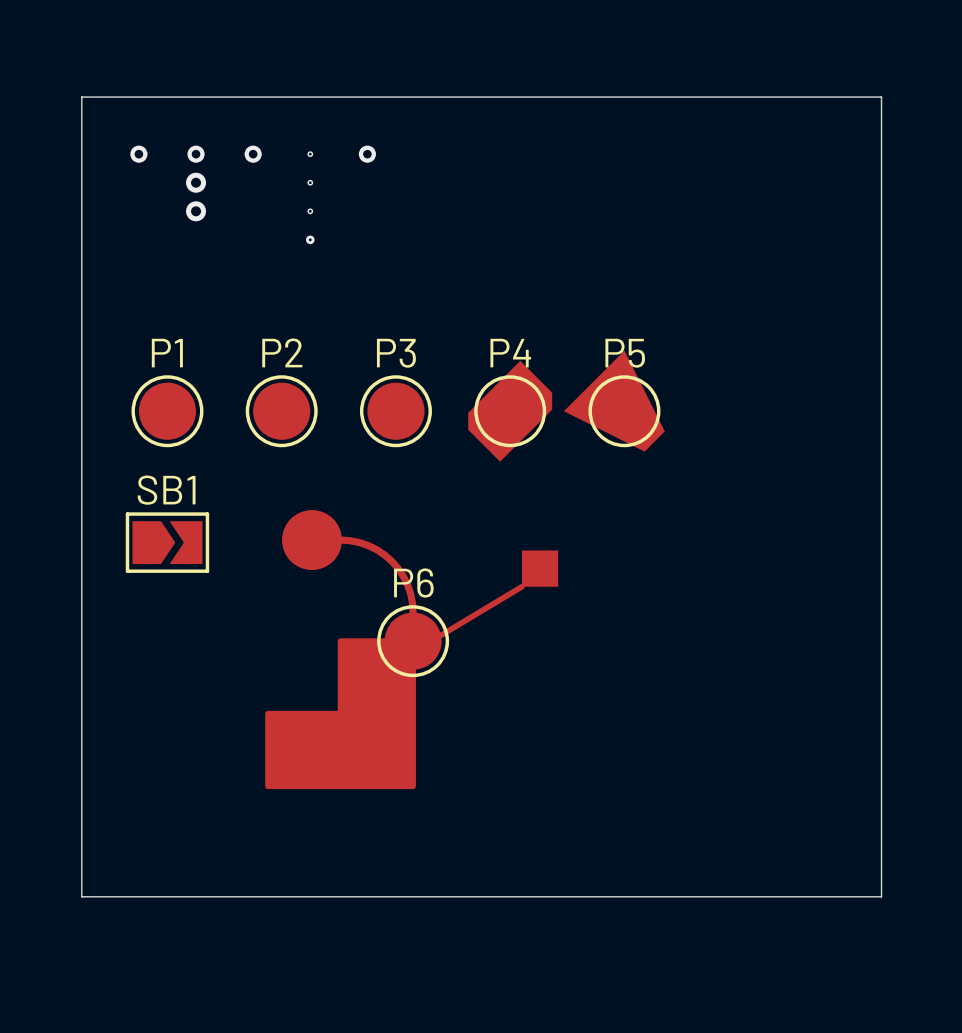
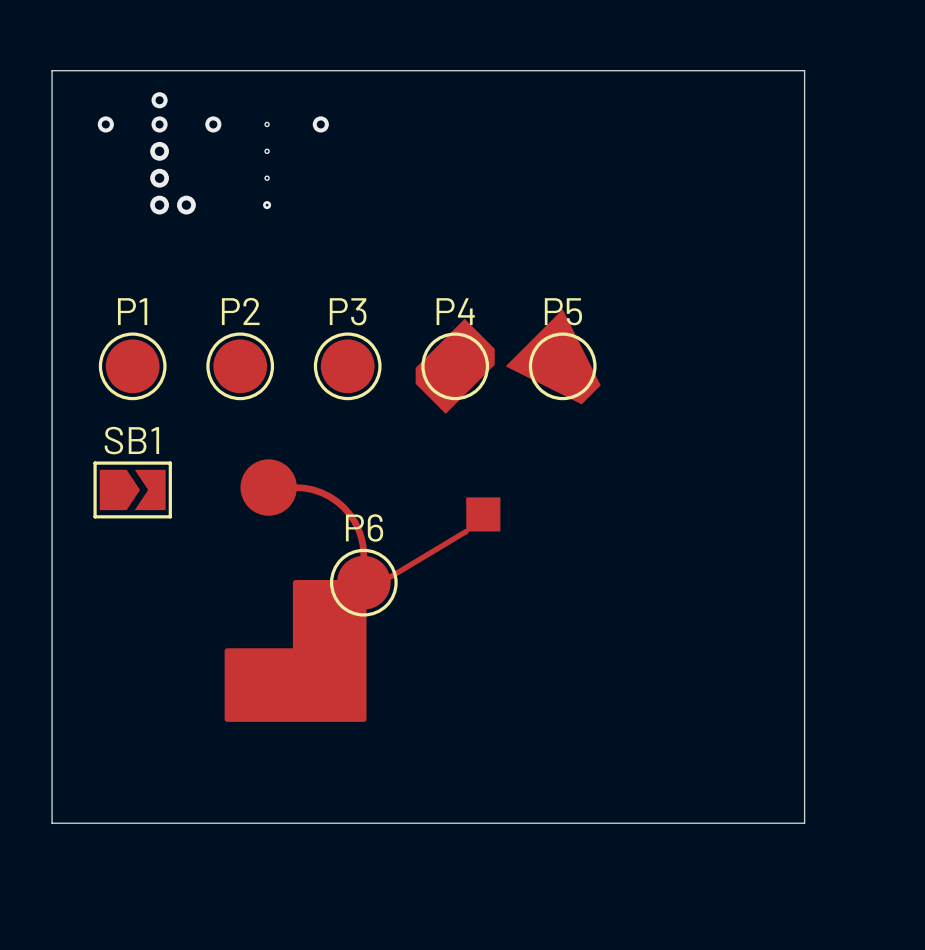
via: none -> (159, 100)
via: none -> (159, 205)
via: none -> (186, 205)

